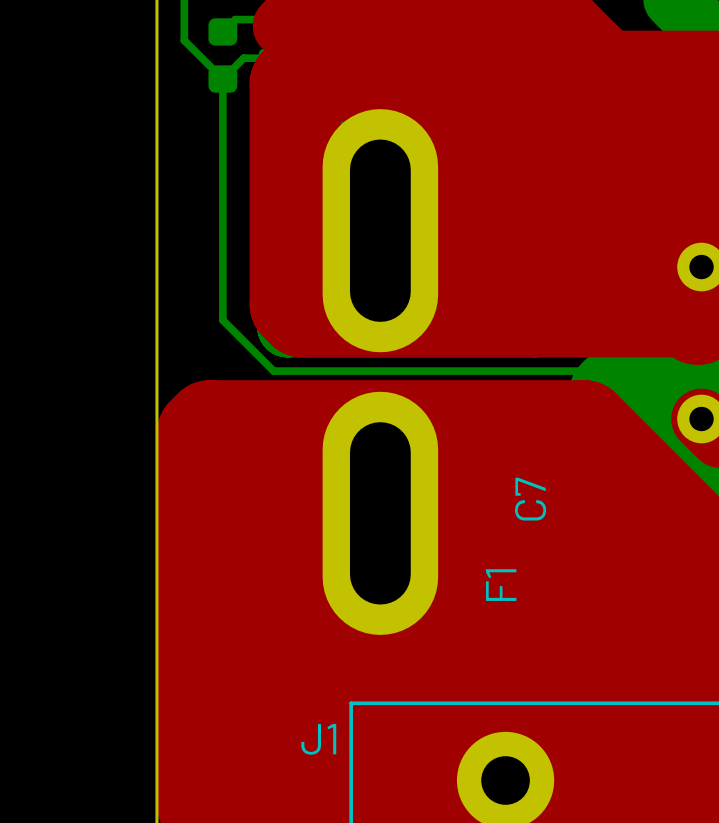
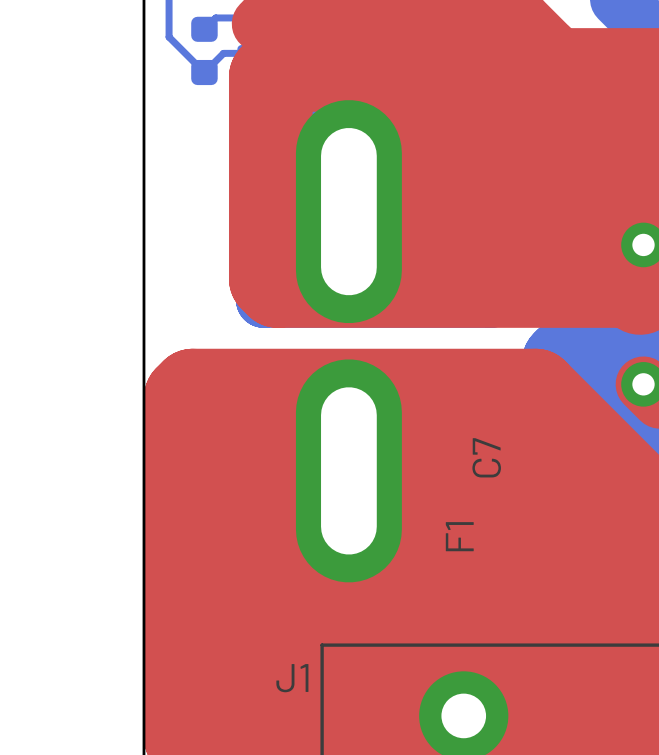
bottom track: (222, 79) (222, 320) (273, 371) (590, 371) (614, 395) -> none

